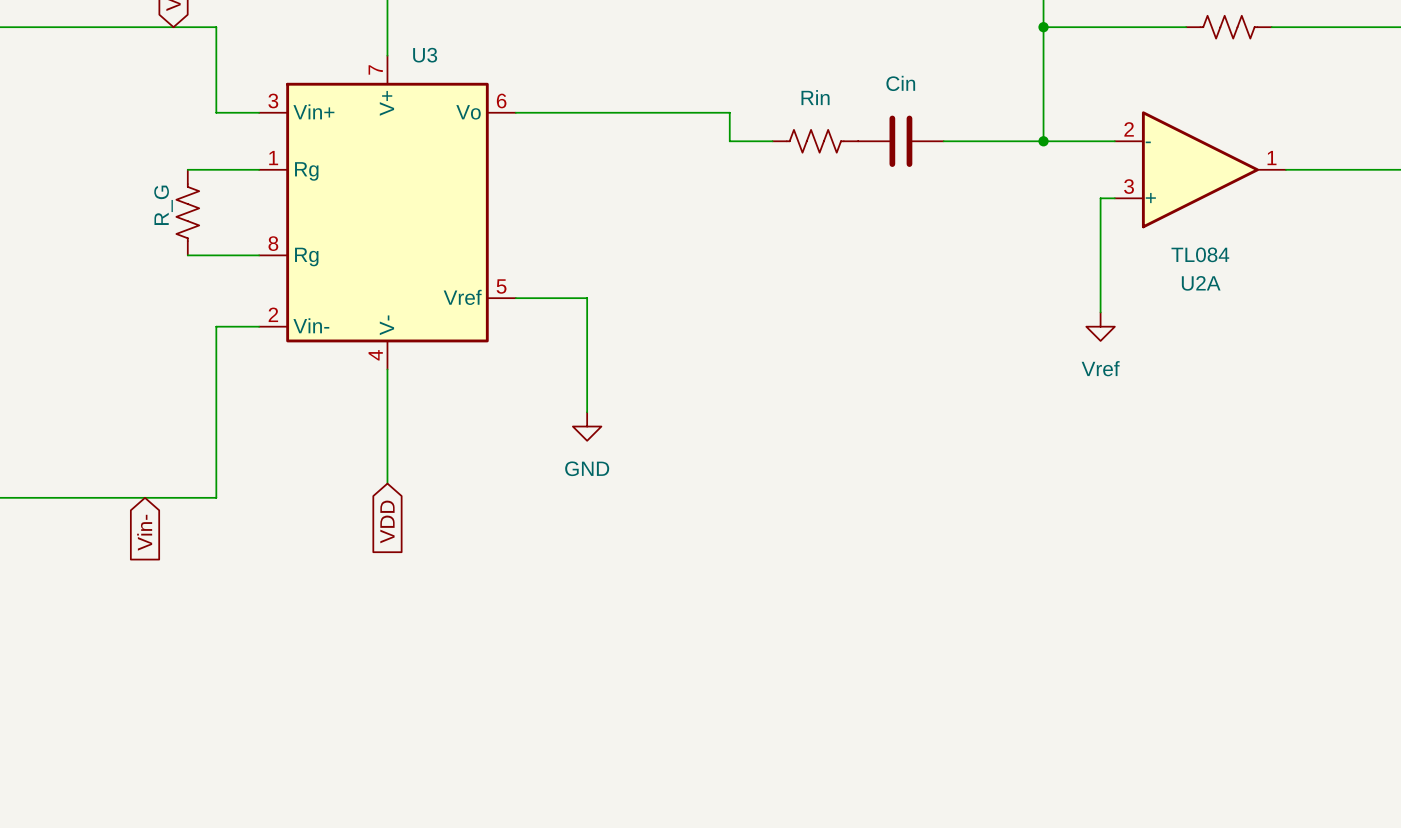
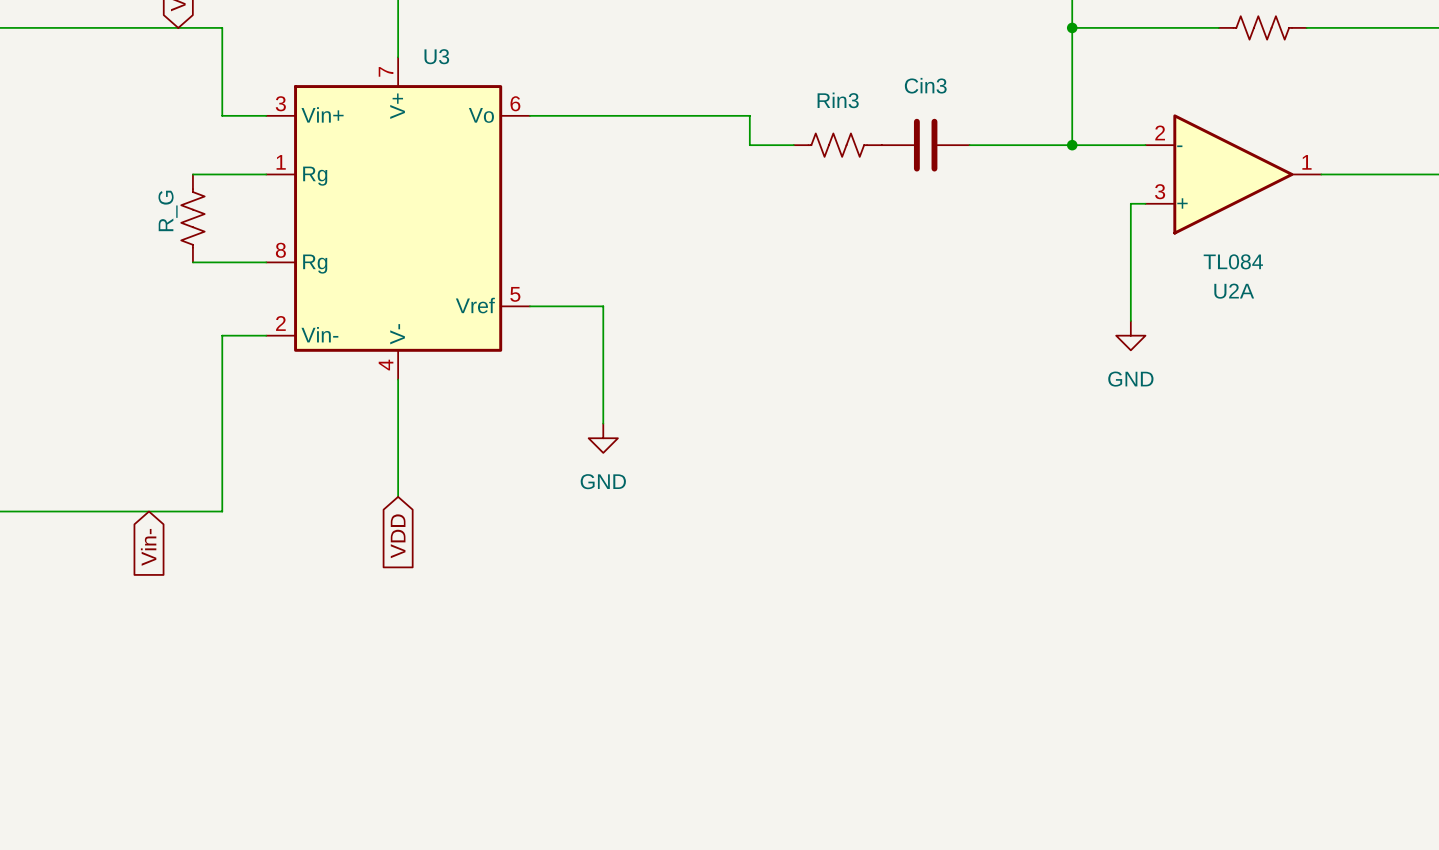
Cin name: Cin (900, 83) -> Cin3 (925, 85)
Rin name: Rin (815, 97) -> Rin3 (838, 100)
power symbol: Vref (1100, 326) -> GND (1130, 335)

